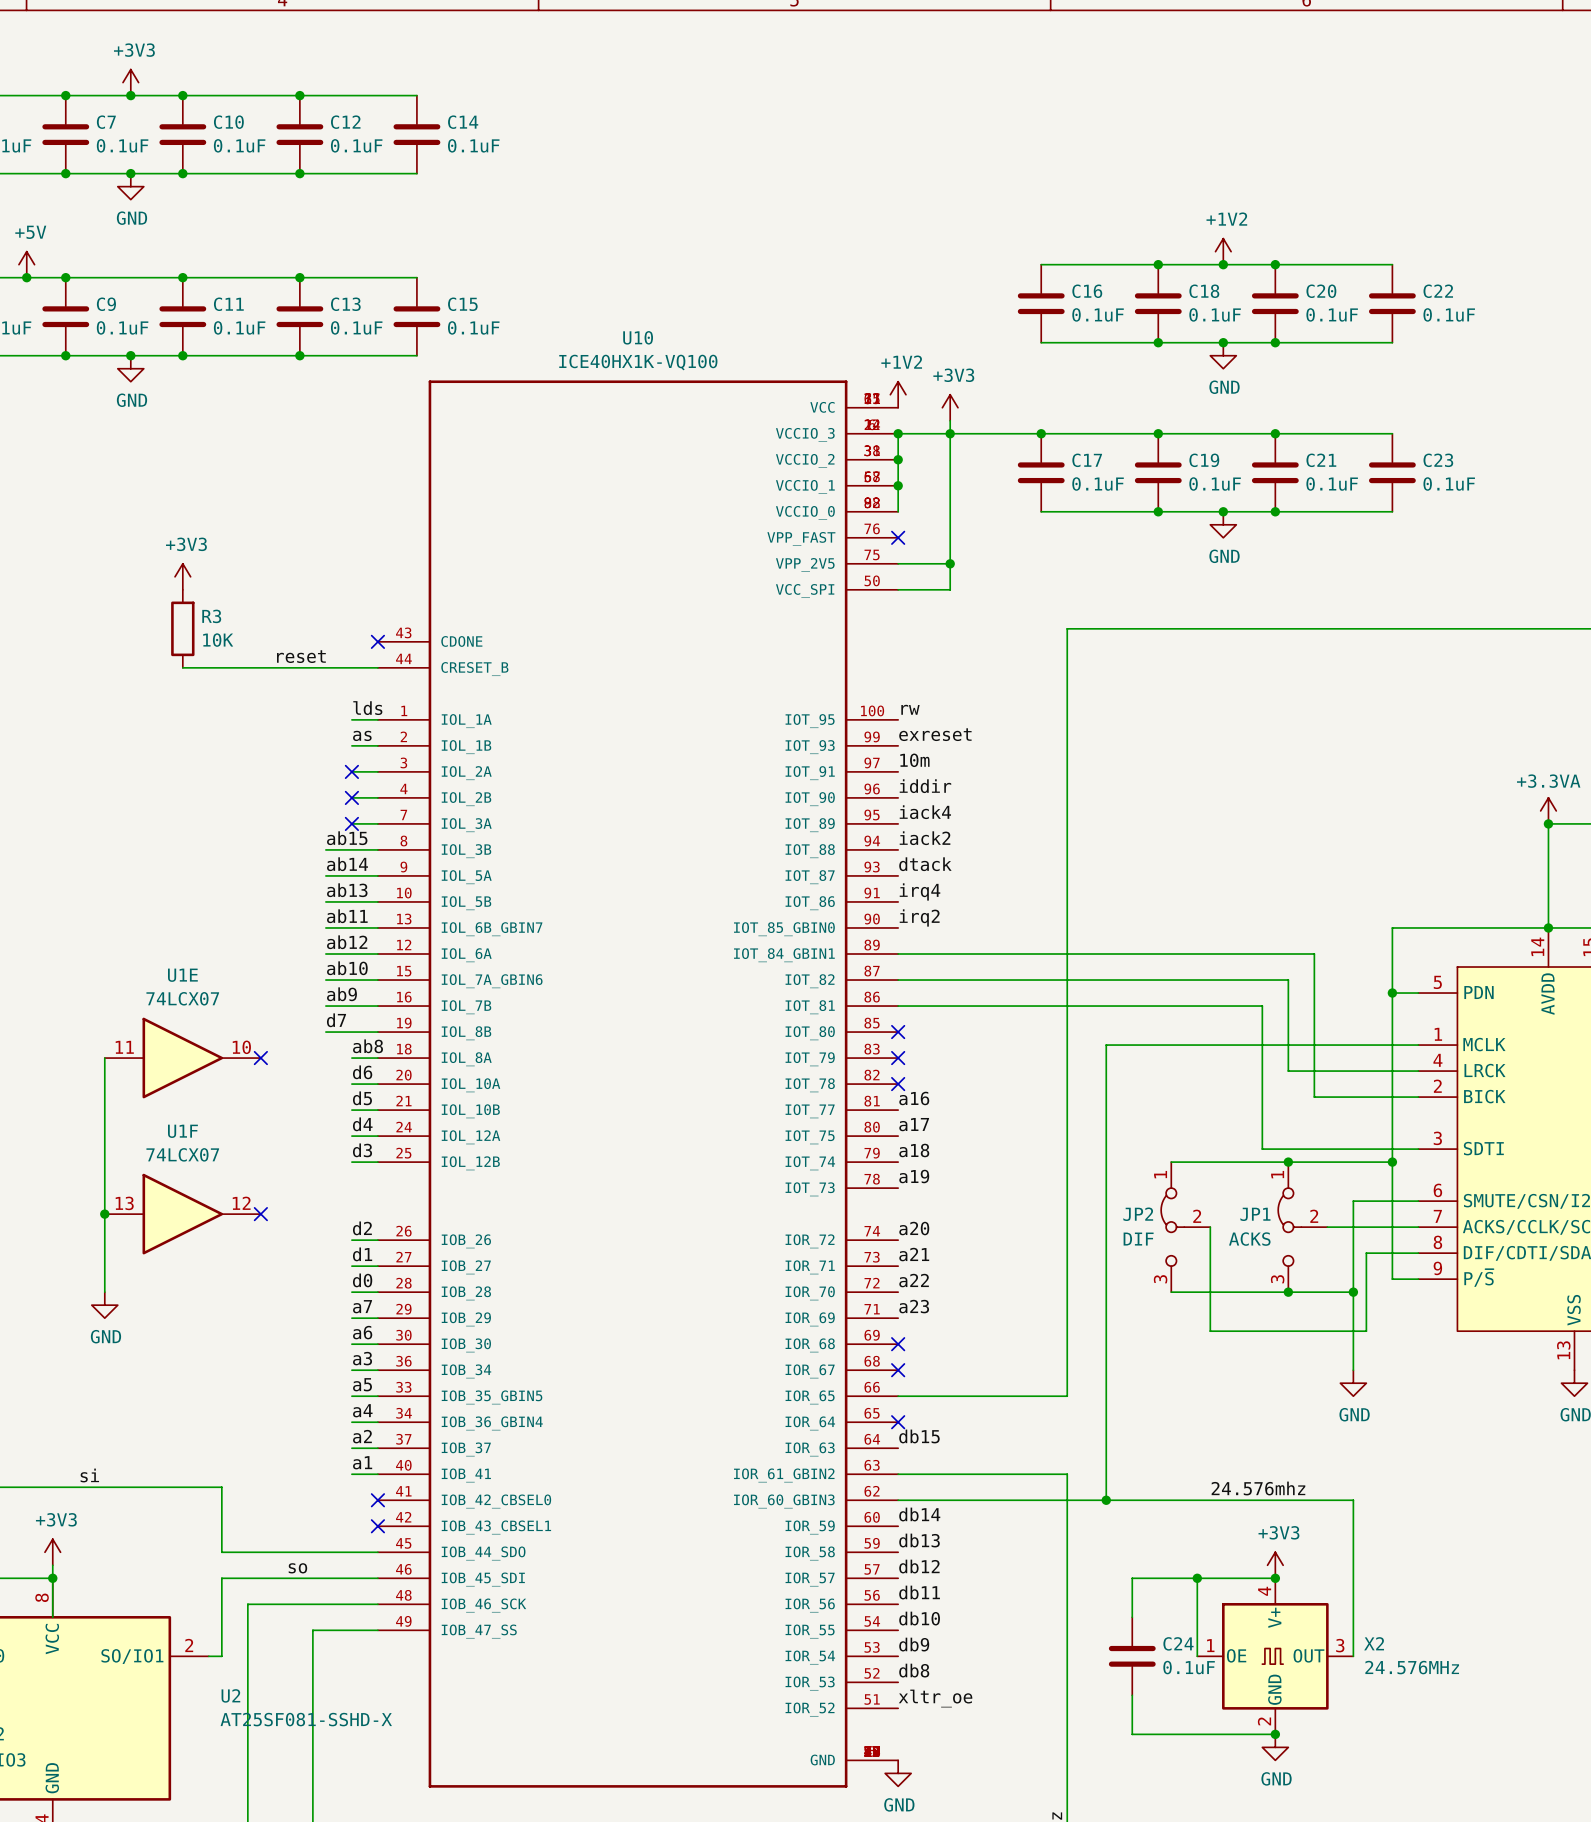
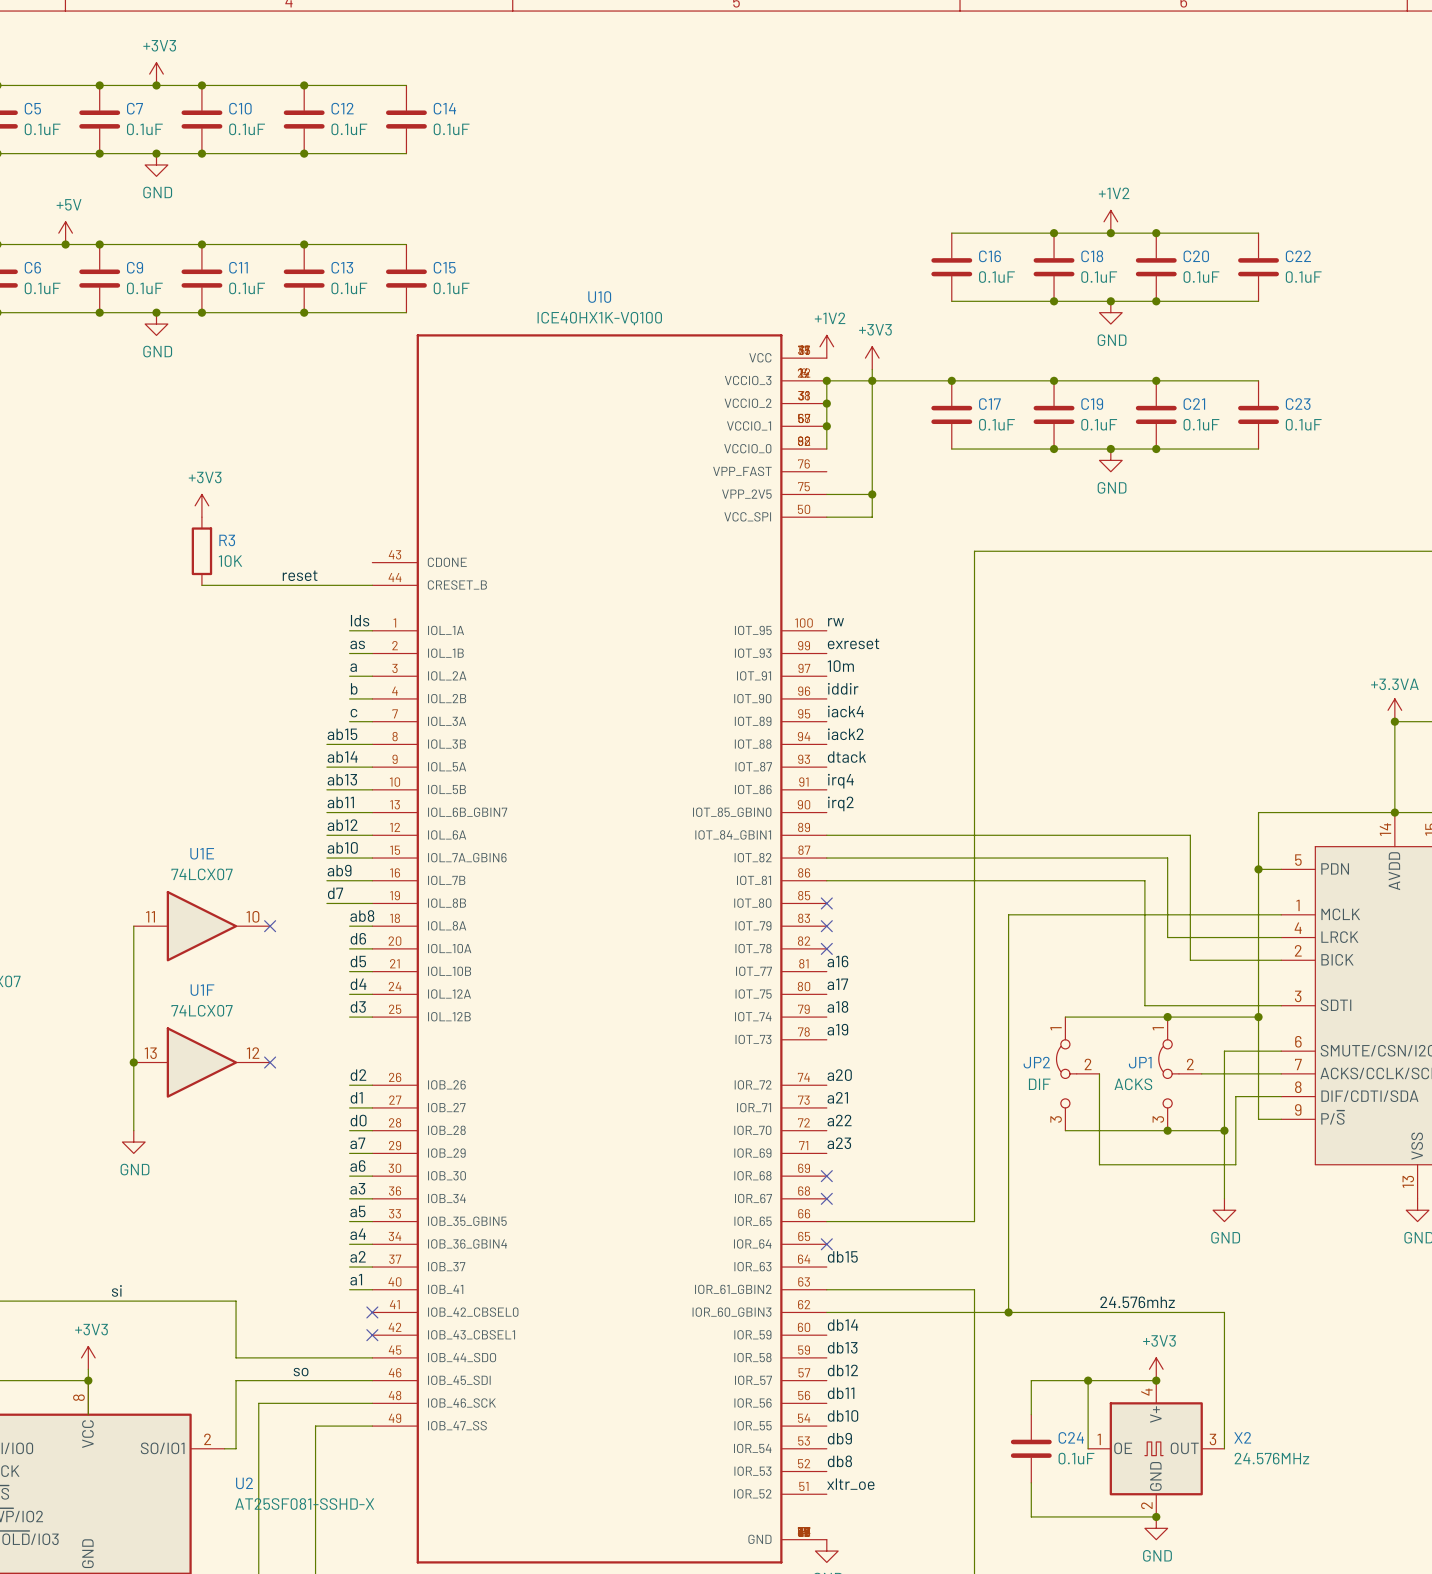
no-connect mark: (898, 537) -> none
no-connect mark: (377, 641) -> none
label: none -> a (353, 667)
no-connect mark: (351, 771) -> none
label: none -> b (354, 688)
no-connect mark: (351, 797) -> none
label: none -> c (353, 713)
no-connect mark: (351, 823) -> none

